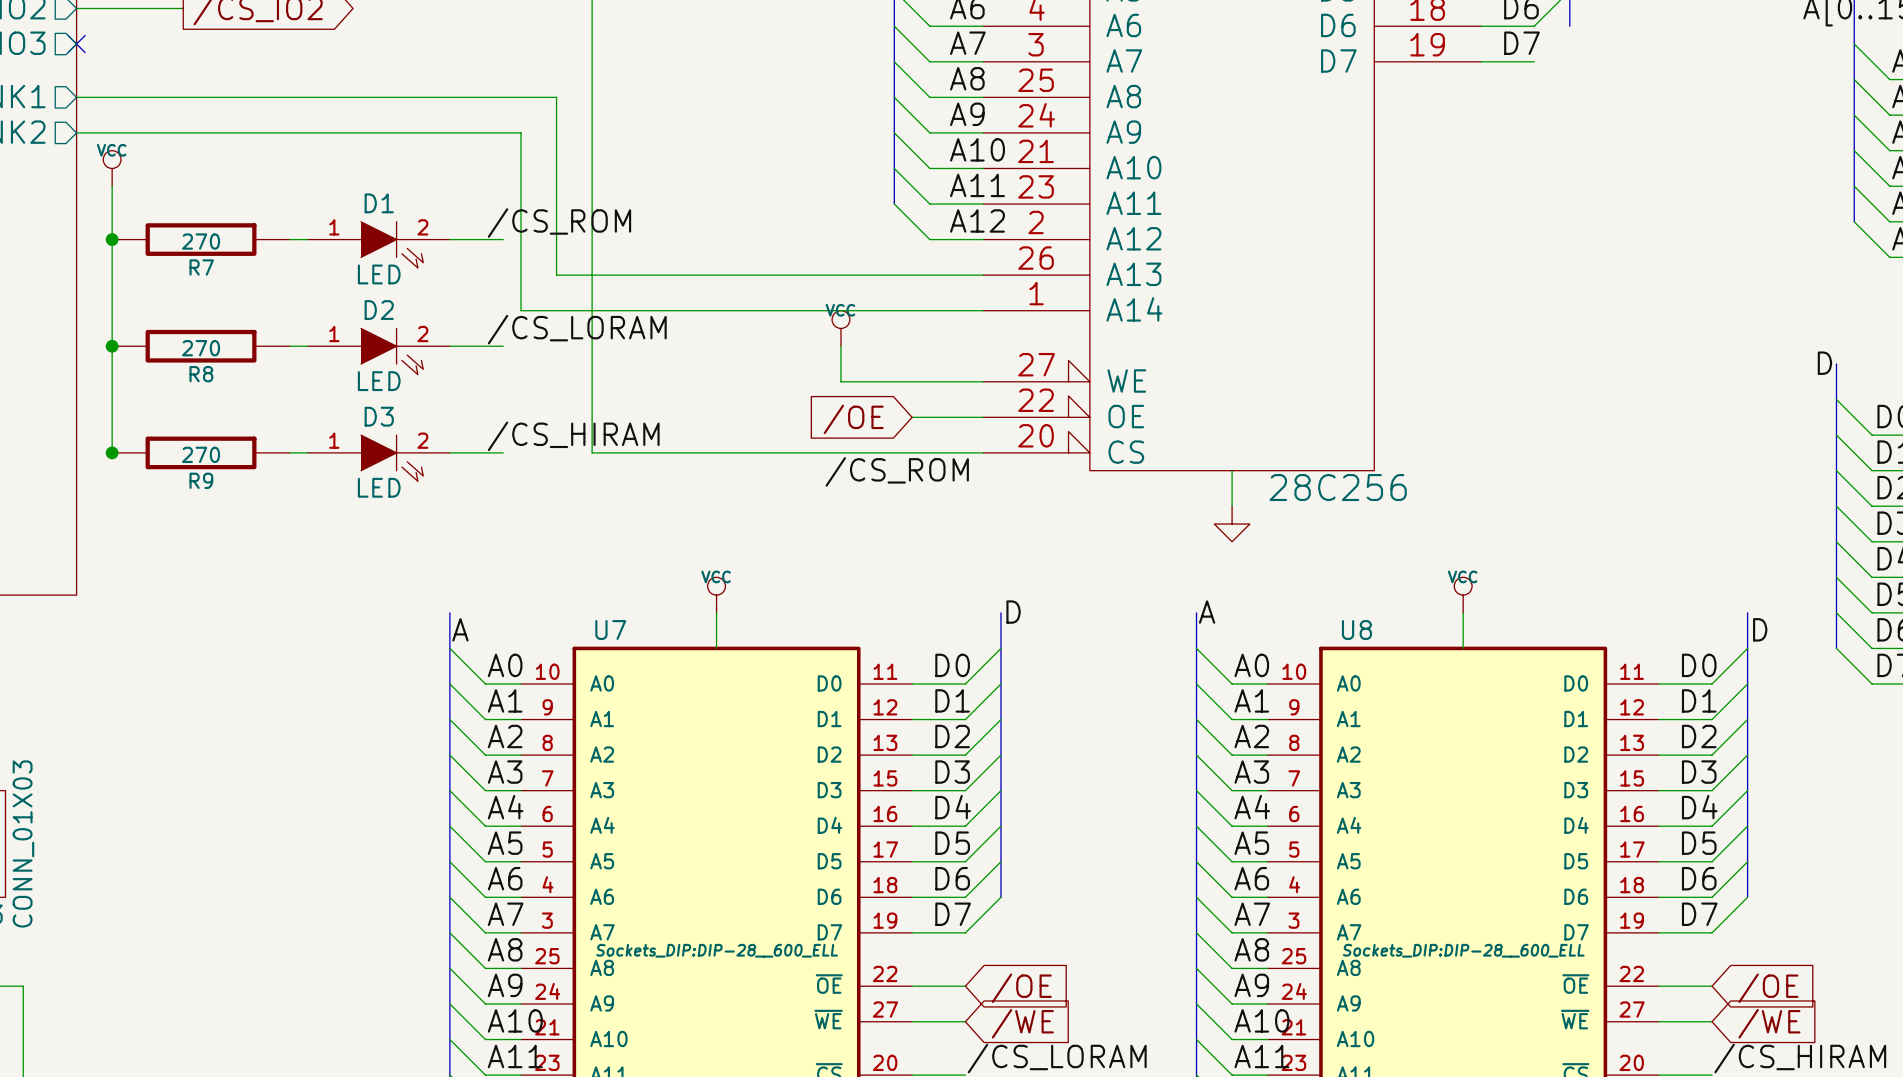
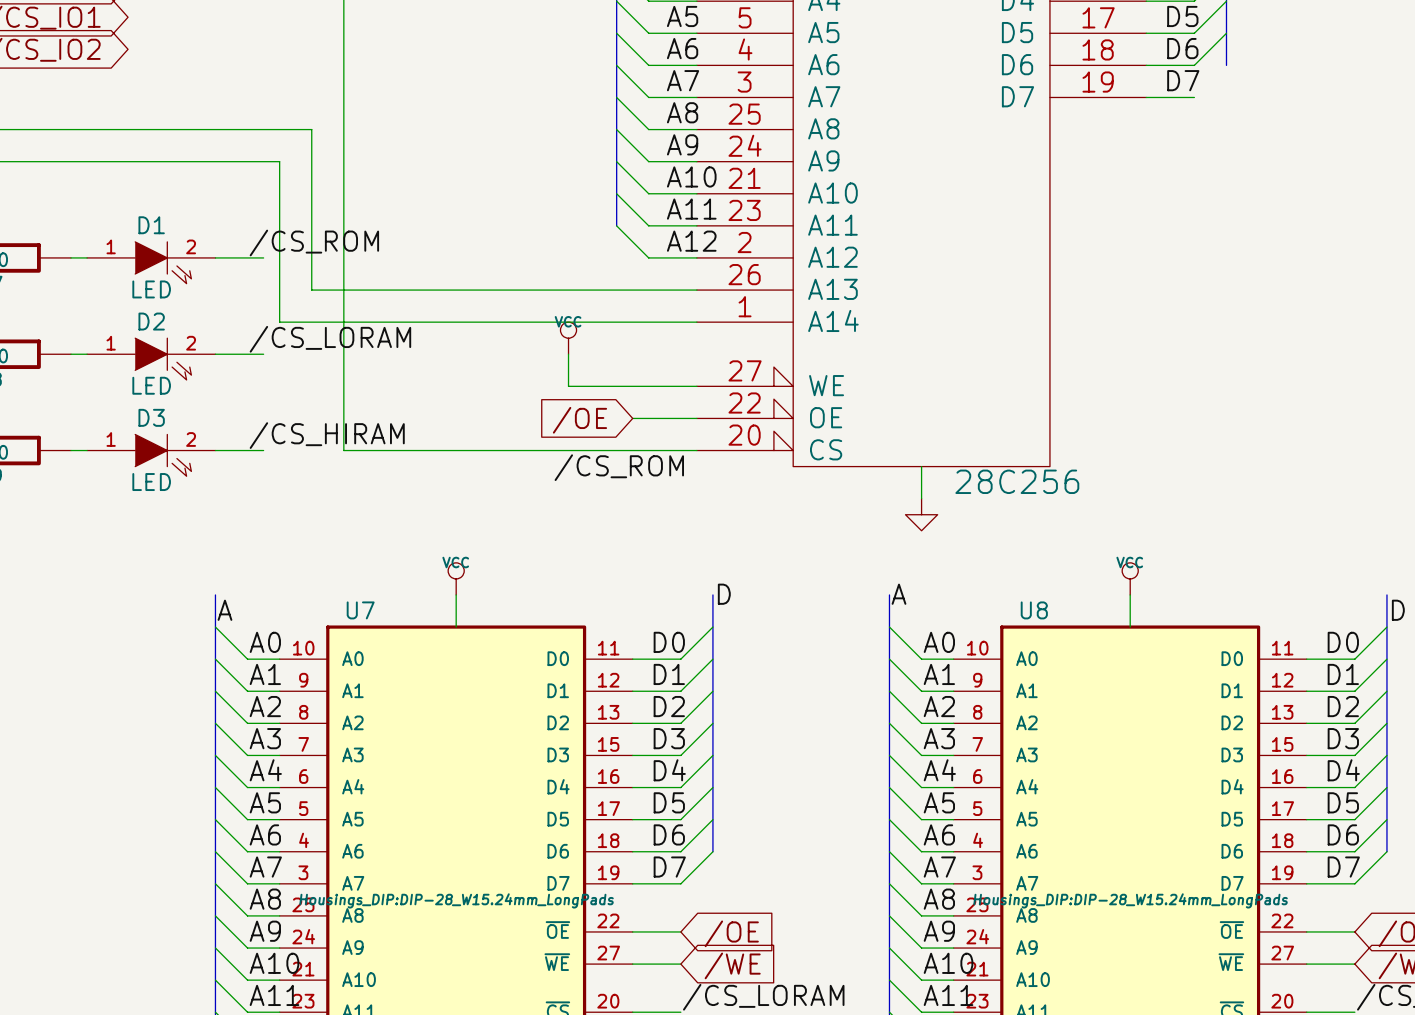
U7 text: Sockets_DIP:DIP-28__600_ELL (717, 950) -> Housings_DIP:DIP-28_W15.24mm_LongPads (456, 900)
U8 text: Sockets_DIP:DIP-28__600_ELL (1463, 950) -> Housings_DIP:DIP-28_W15.24mm_LongPads (1130, 900)

